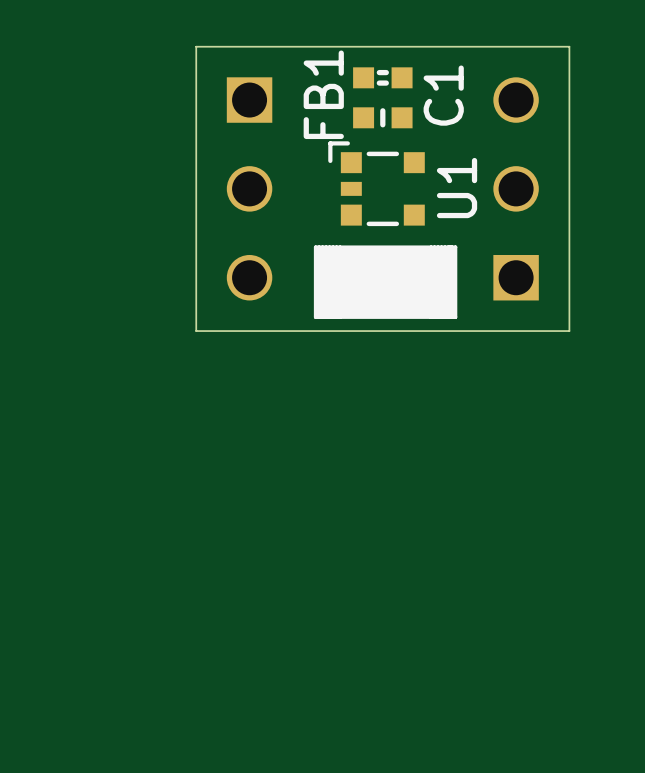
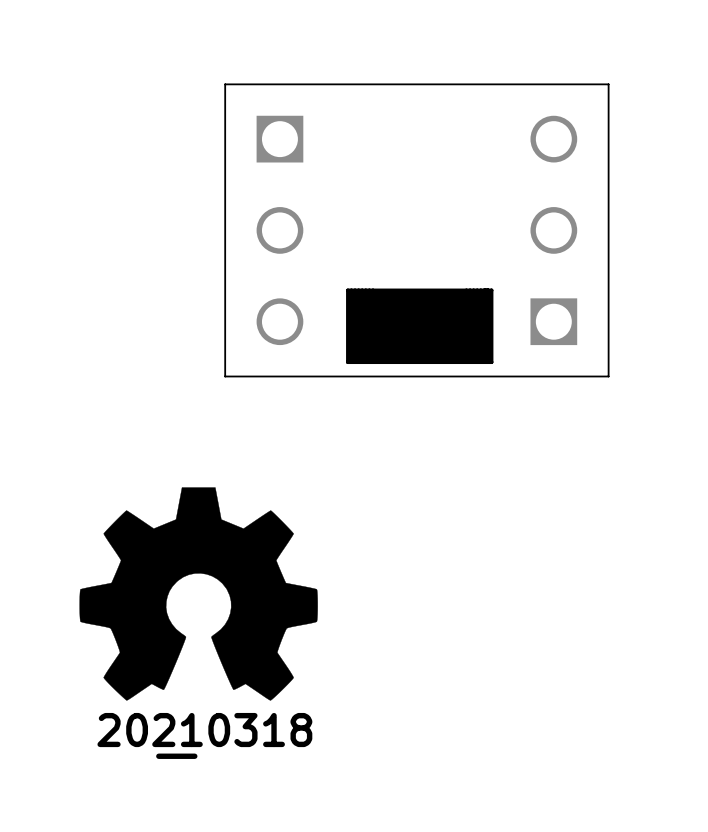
FB1: (382, 77) -> none
C1: (382, 117) -> none
U1: (376, 183) -> none
drawing: none -> [79, 487, 318, 759]

